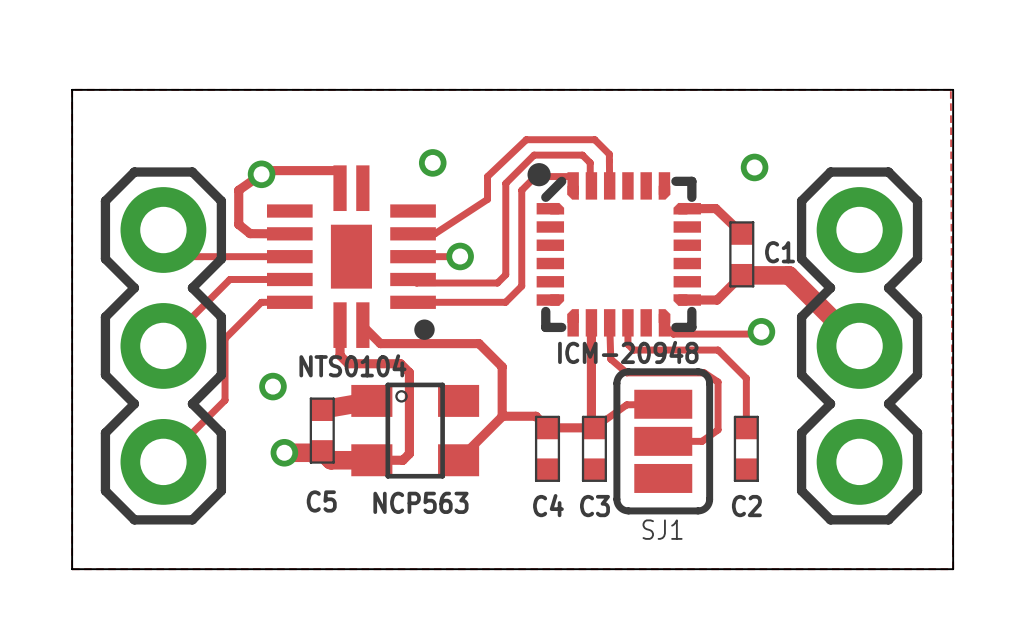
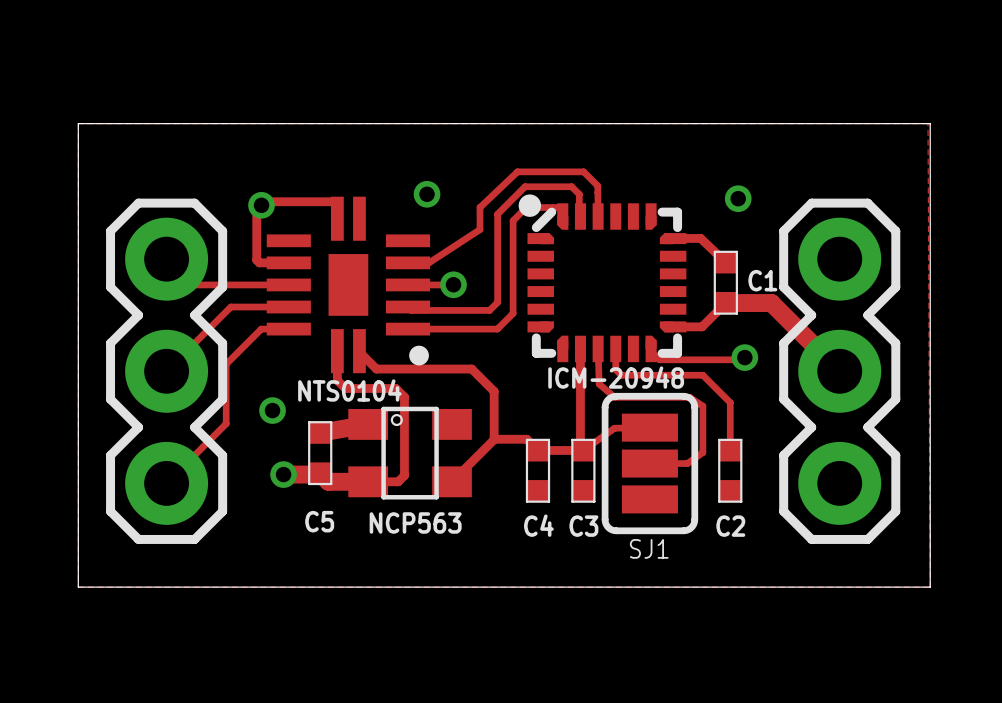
track: (261, 174) (238, 190) (238, 224) (250, 233) (289, 233) -> (261, 205) (256, 210) (256, 260) (259, 262) (288, 262)

